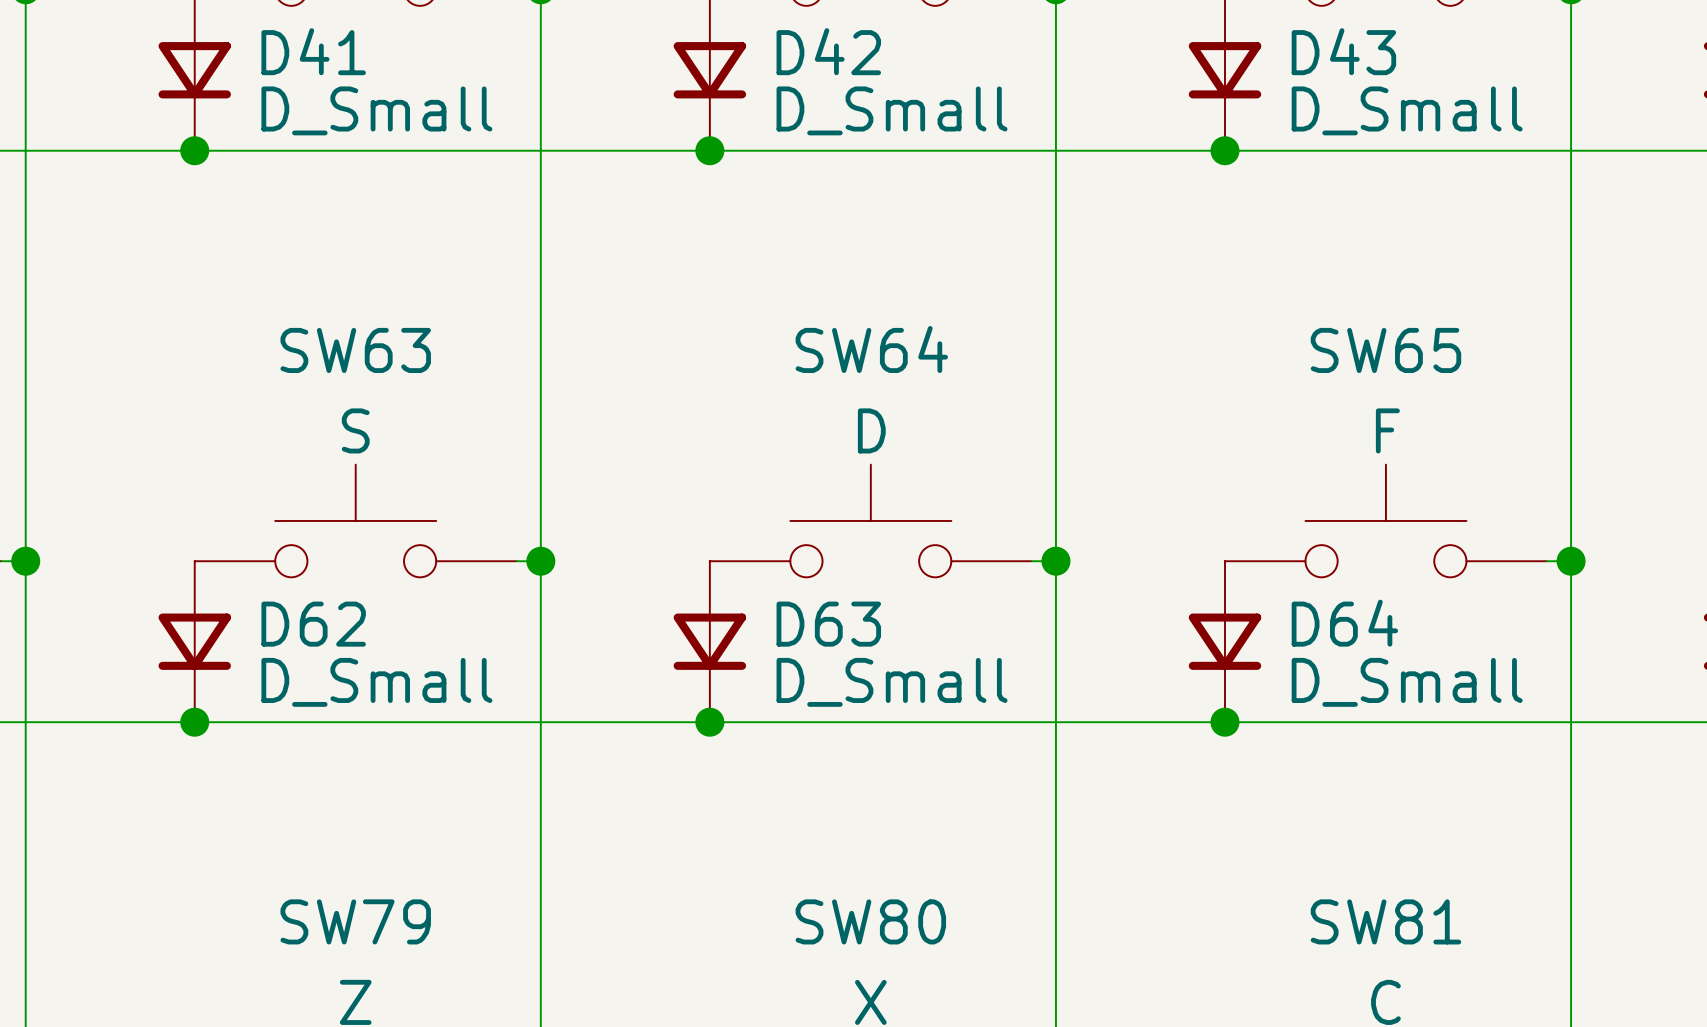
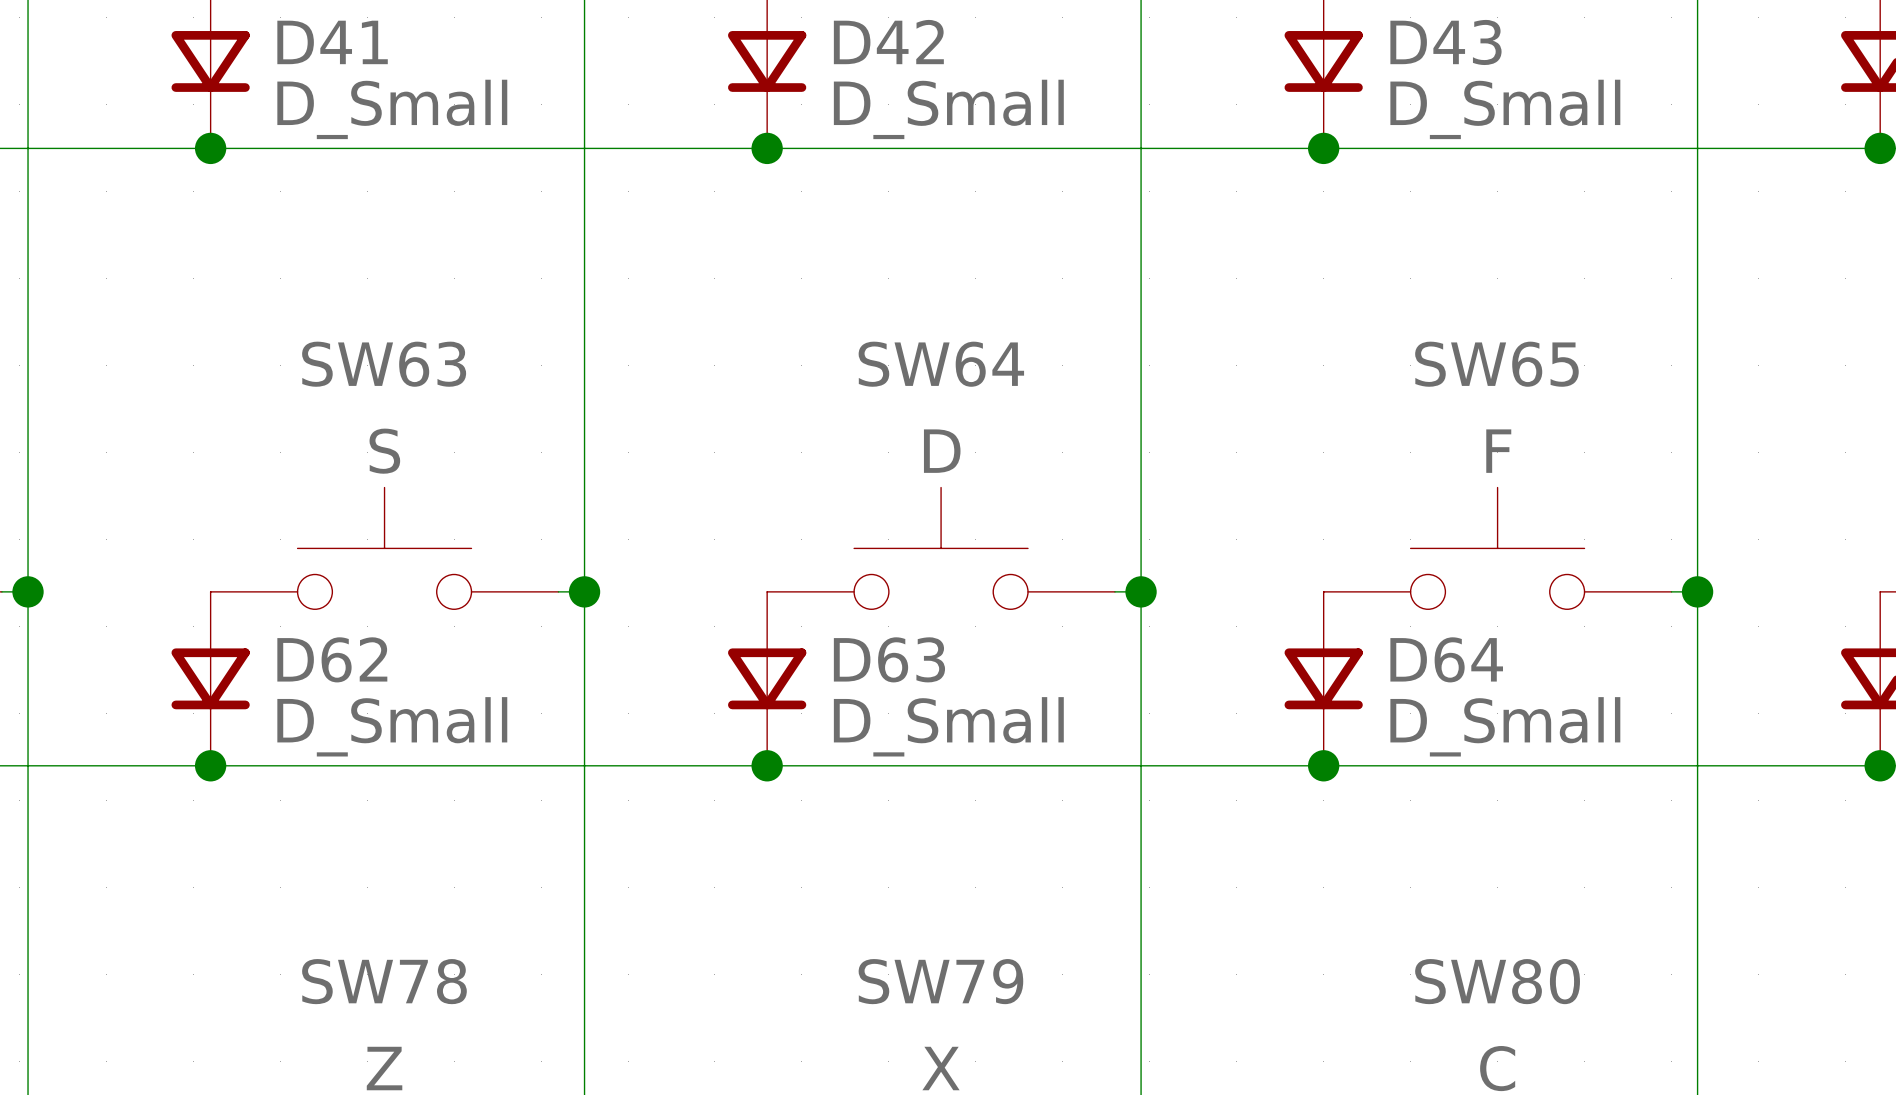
SW79 name: SW79 (355, 921) -> SW78 (384, 981)
SW80 name: SW80 (870, 921) -> SW79 (940, 981)
SW81 name: SW81 (1385, 921) -> SW80 (1497, 981)

